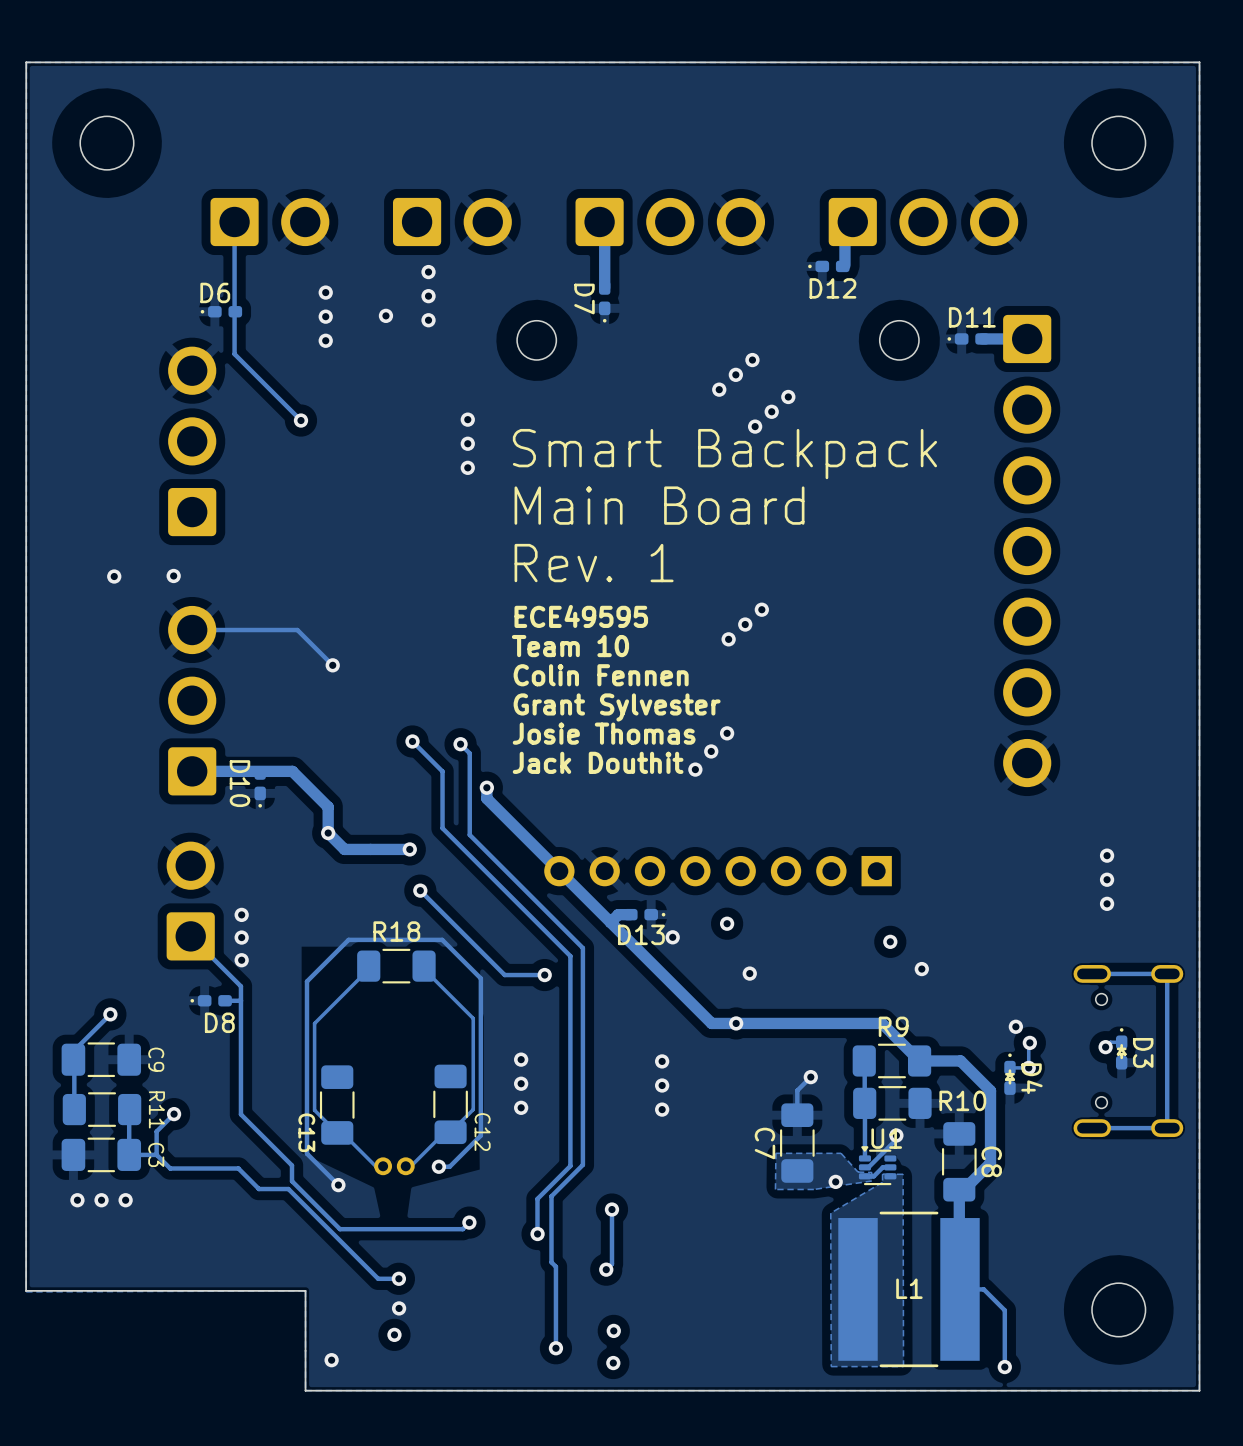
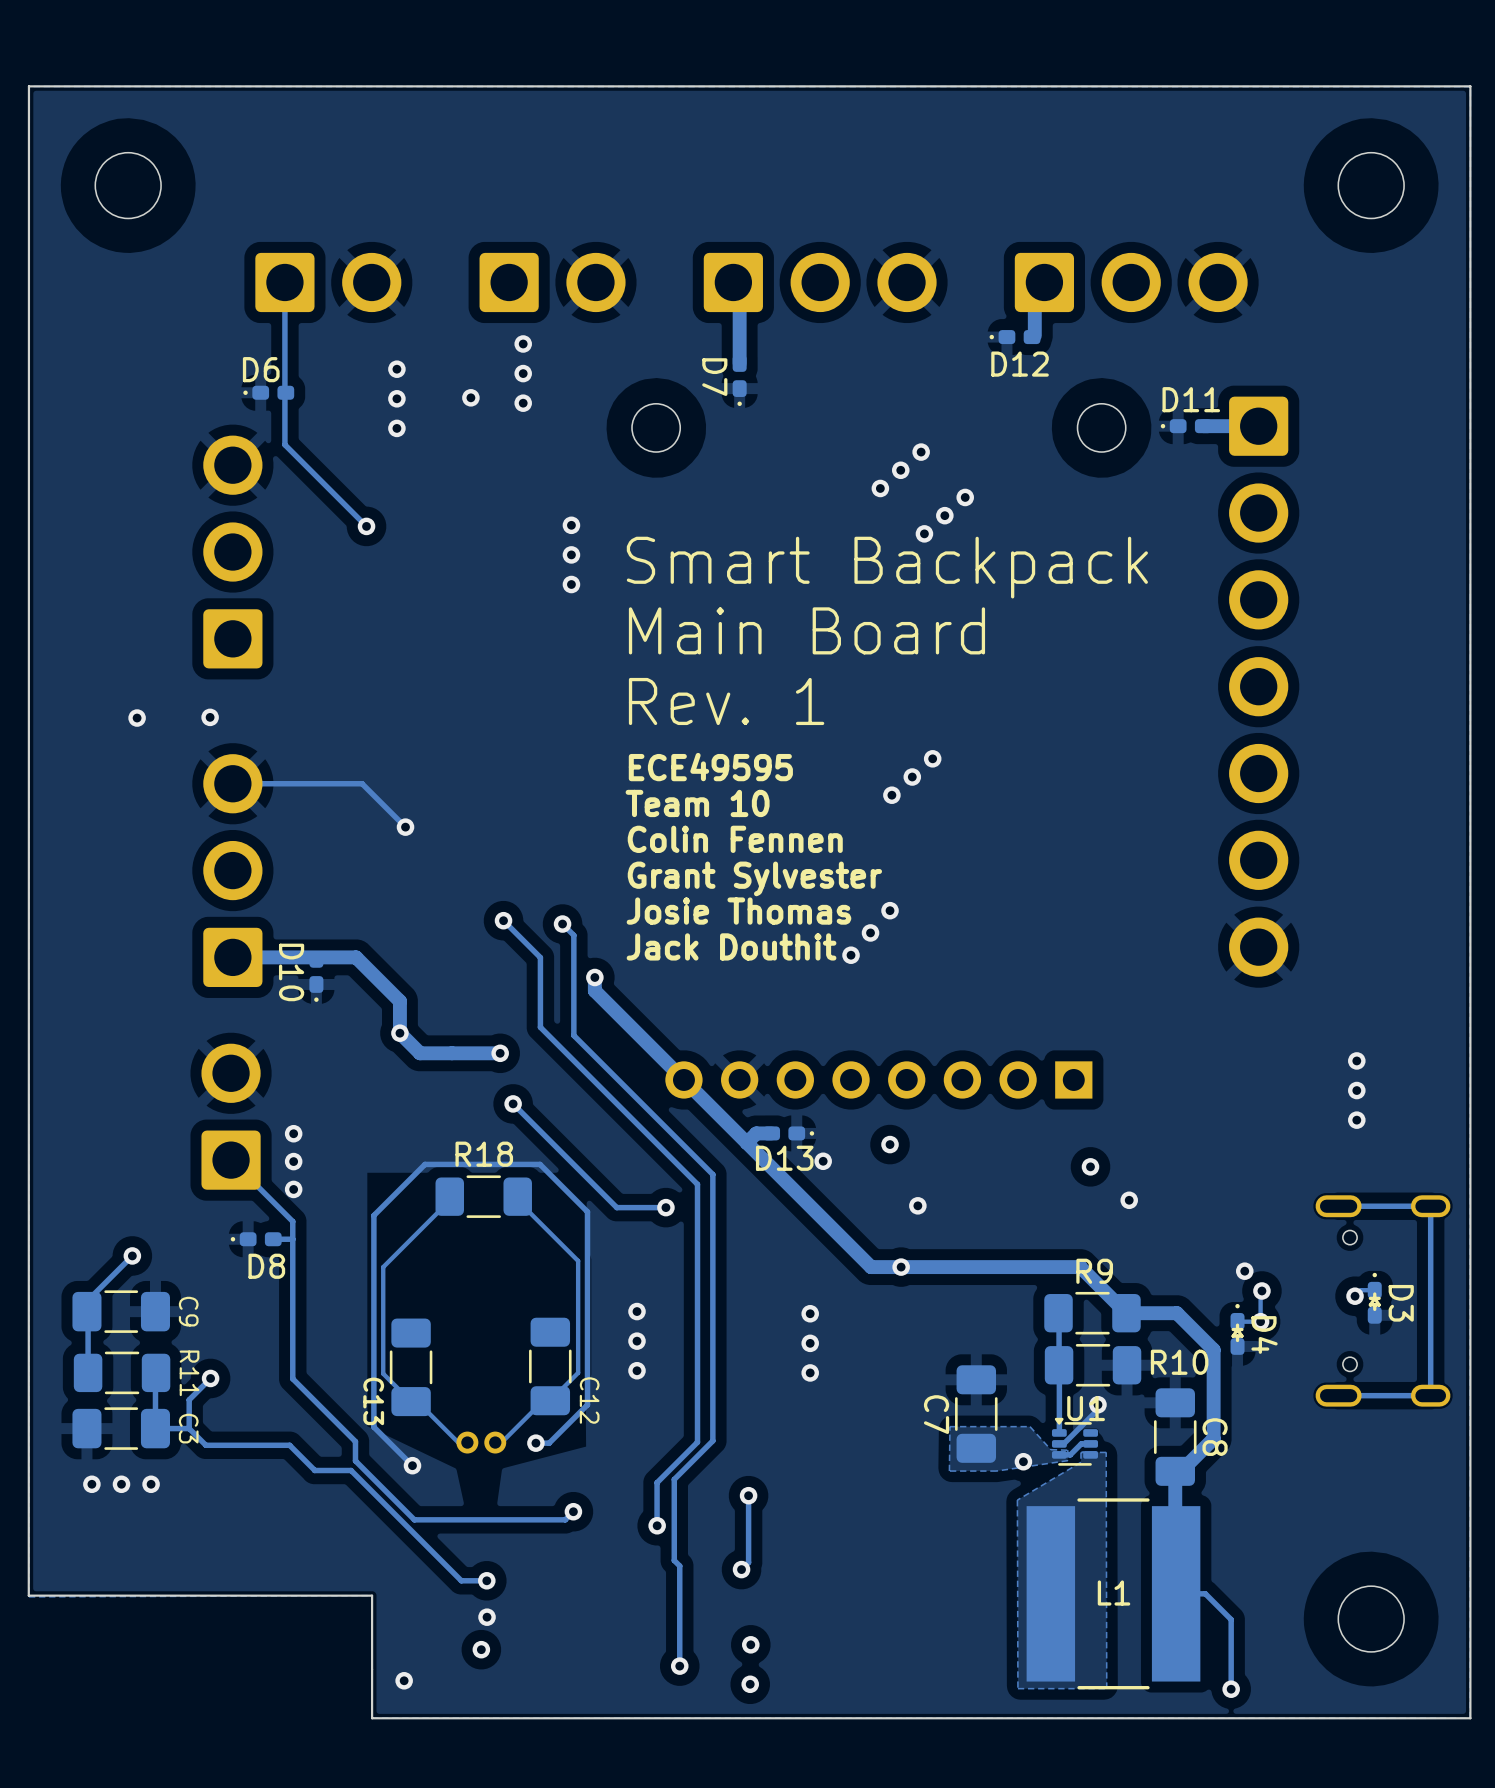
track: (810, 1077) (797, 1090) (797, 1115) -> none
via: (810, 1077) -> none

